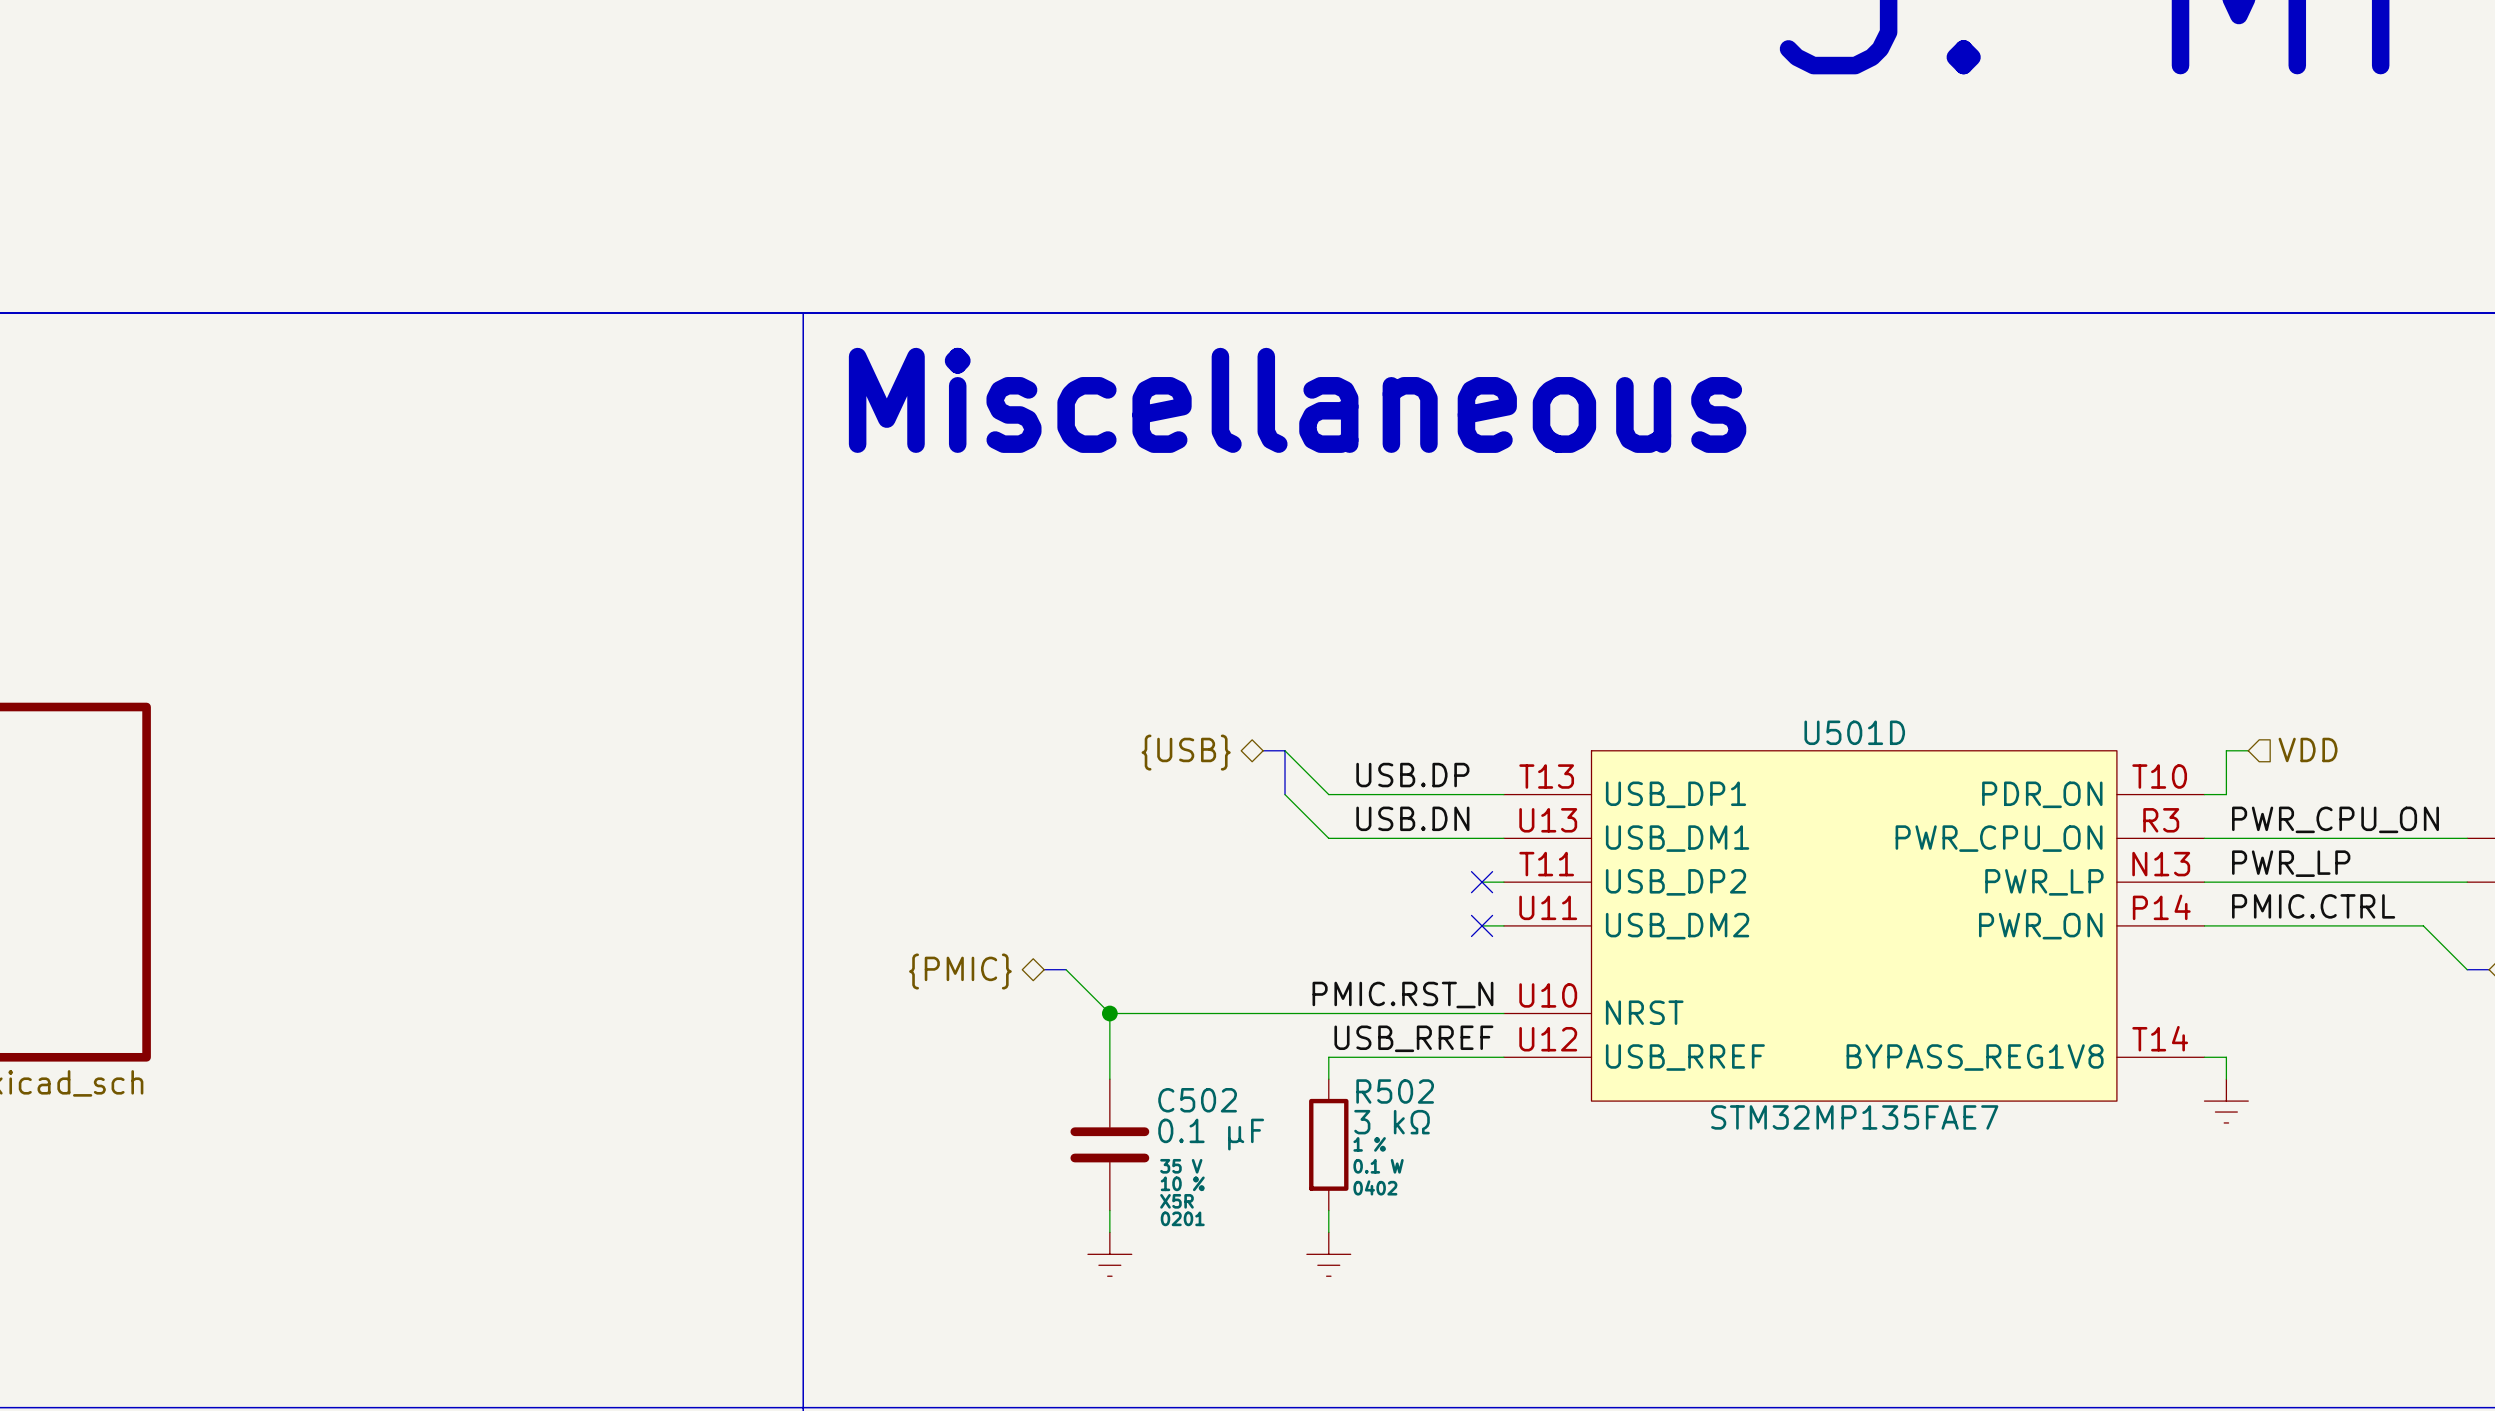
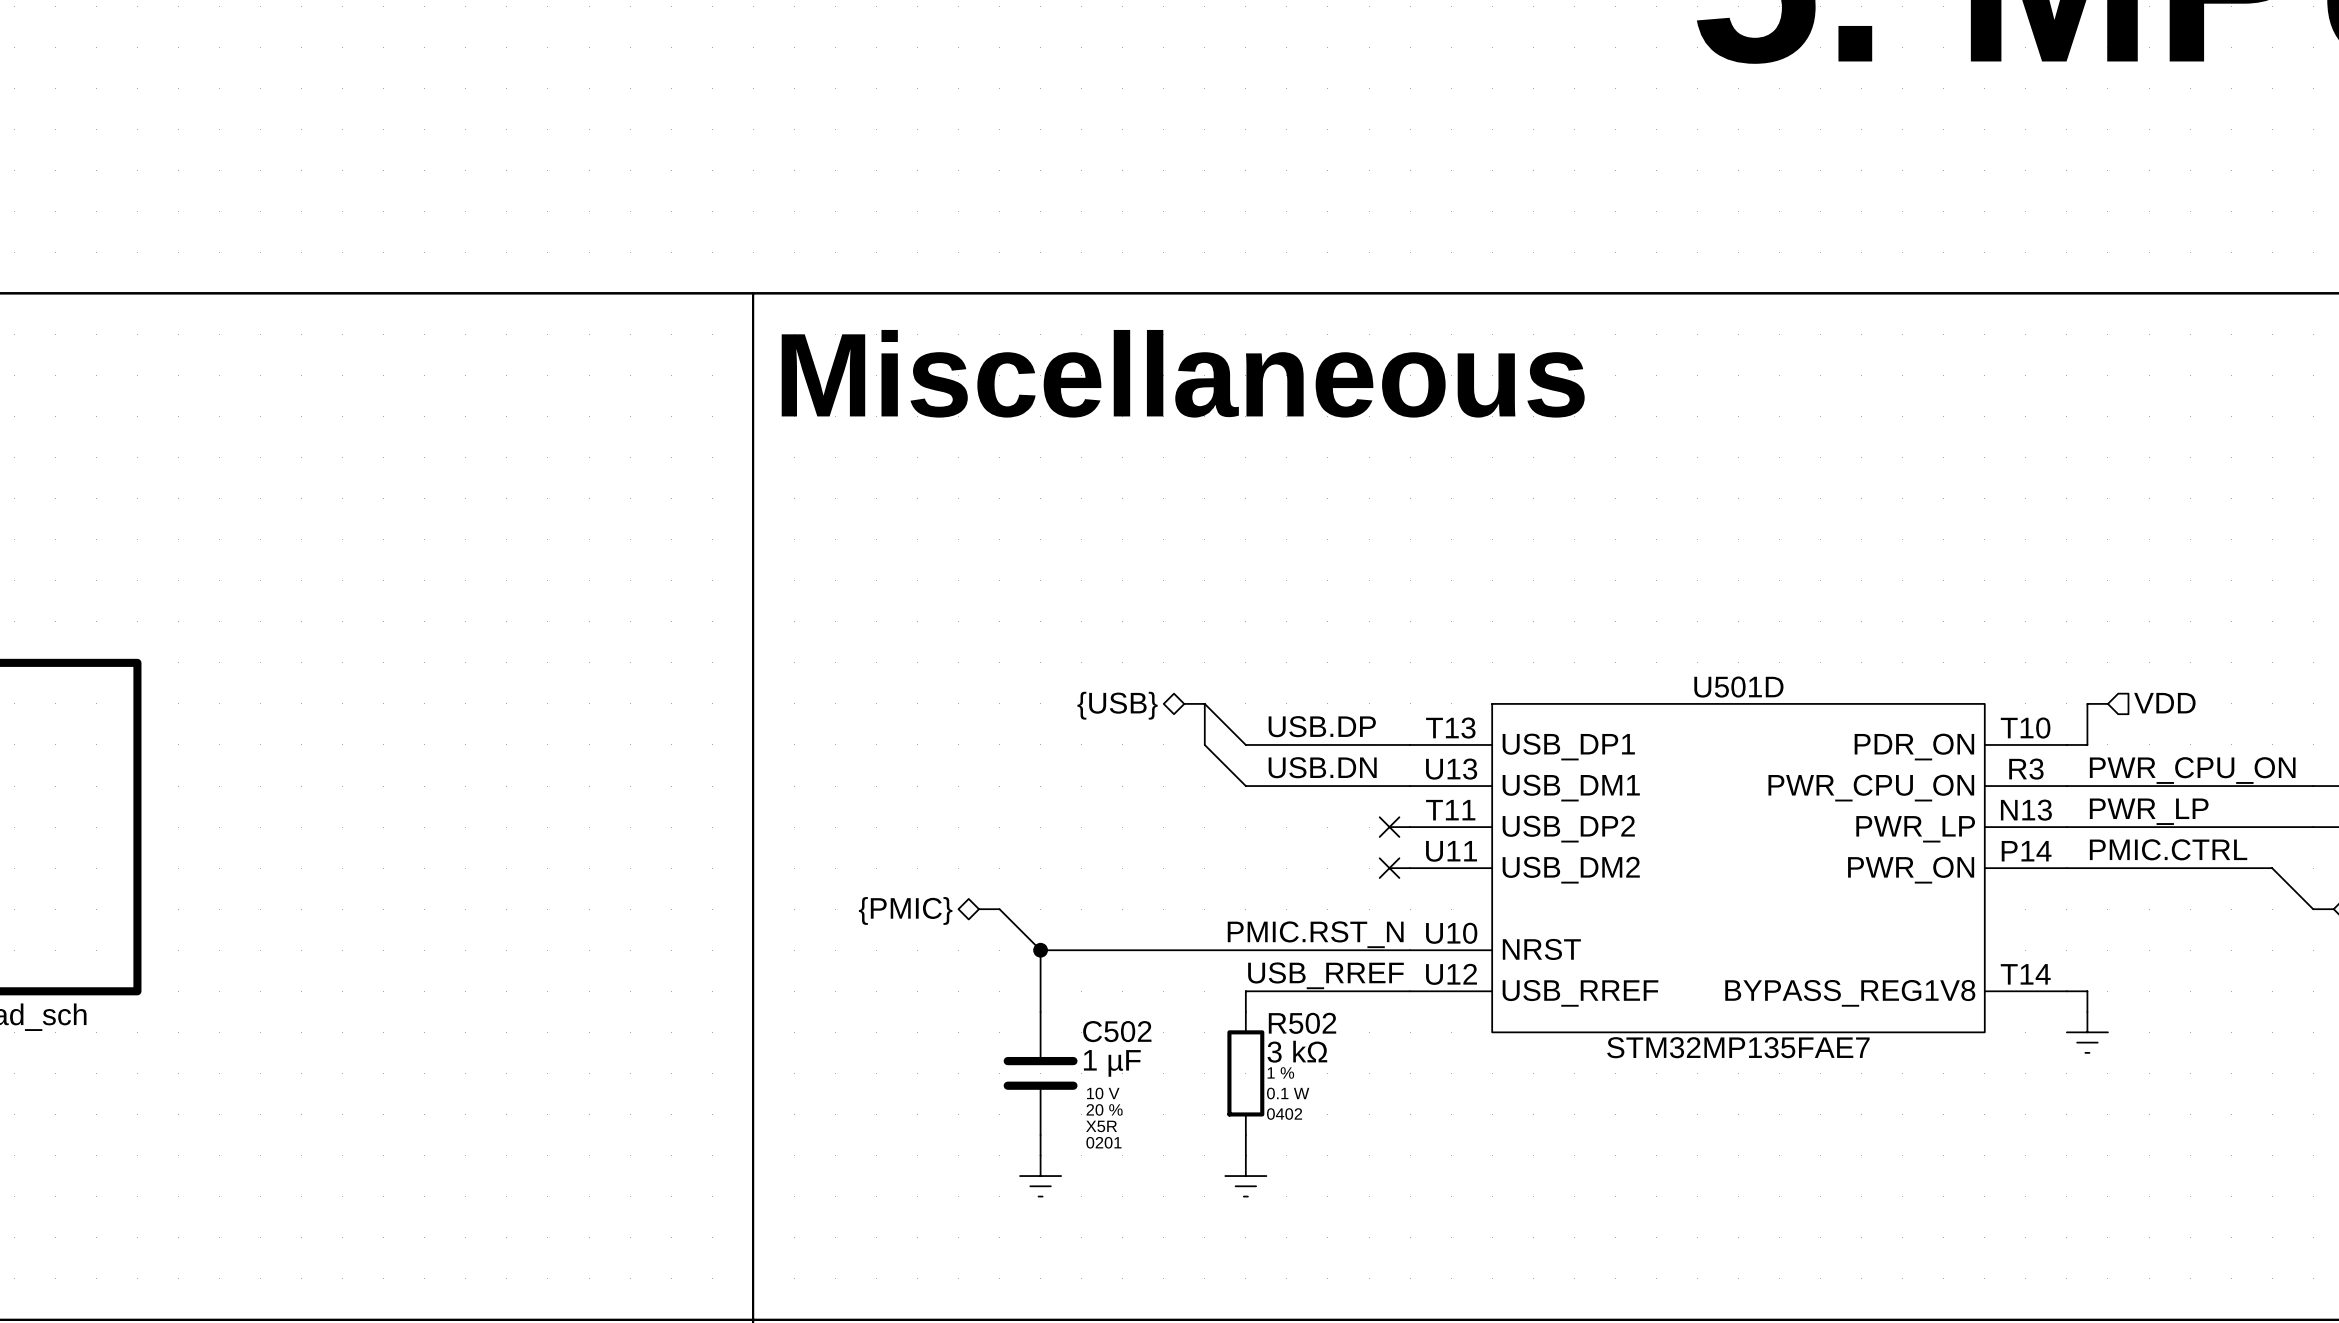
C502 value: 0.1 µF (1211, 1134) -> 1 µF (1112, 1063)
C502 text: 35 V (1181, 1166) -> 10 V (1103, 1093)
C502 text: 10 % (1182, 1183) -> 20 % (1104, 1109)

